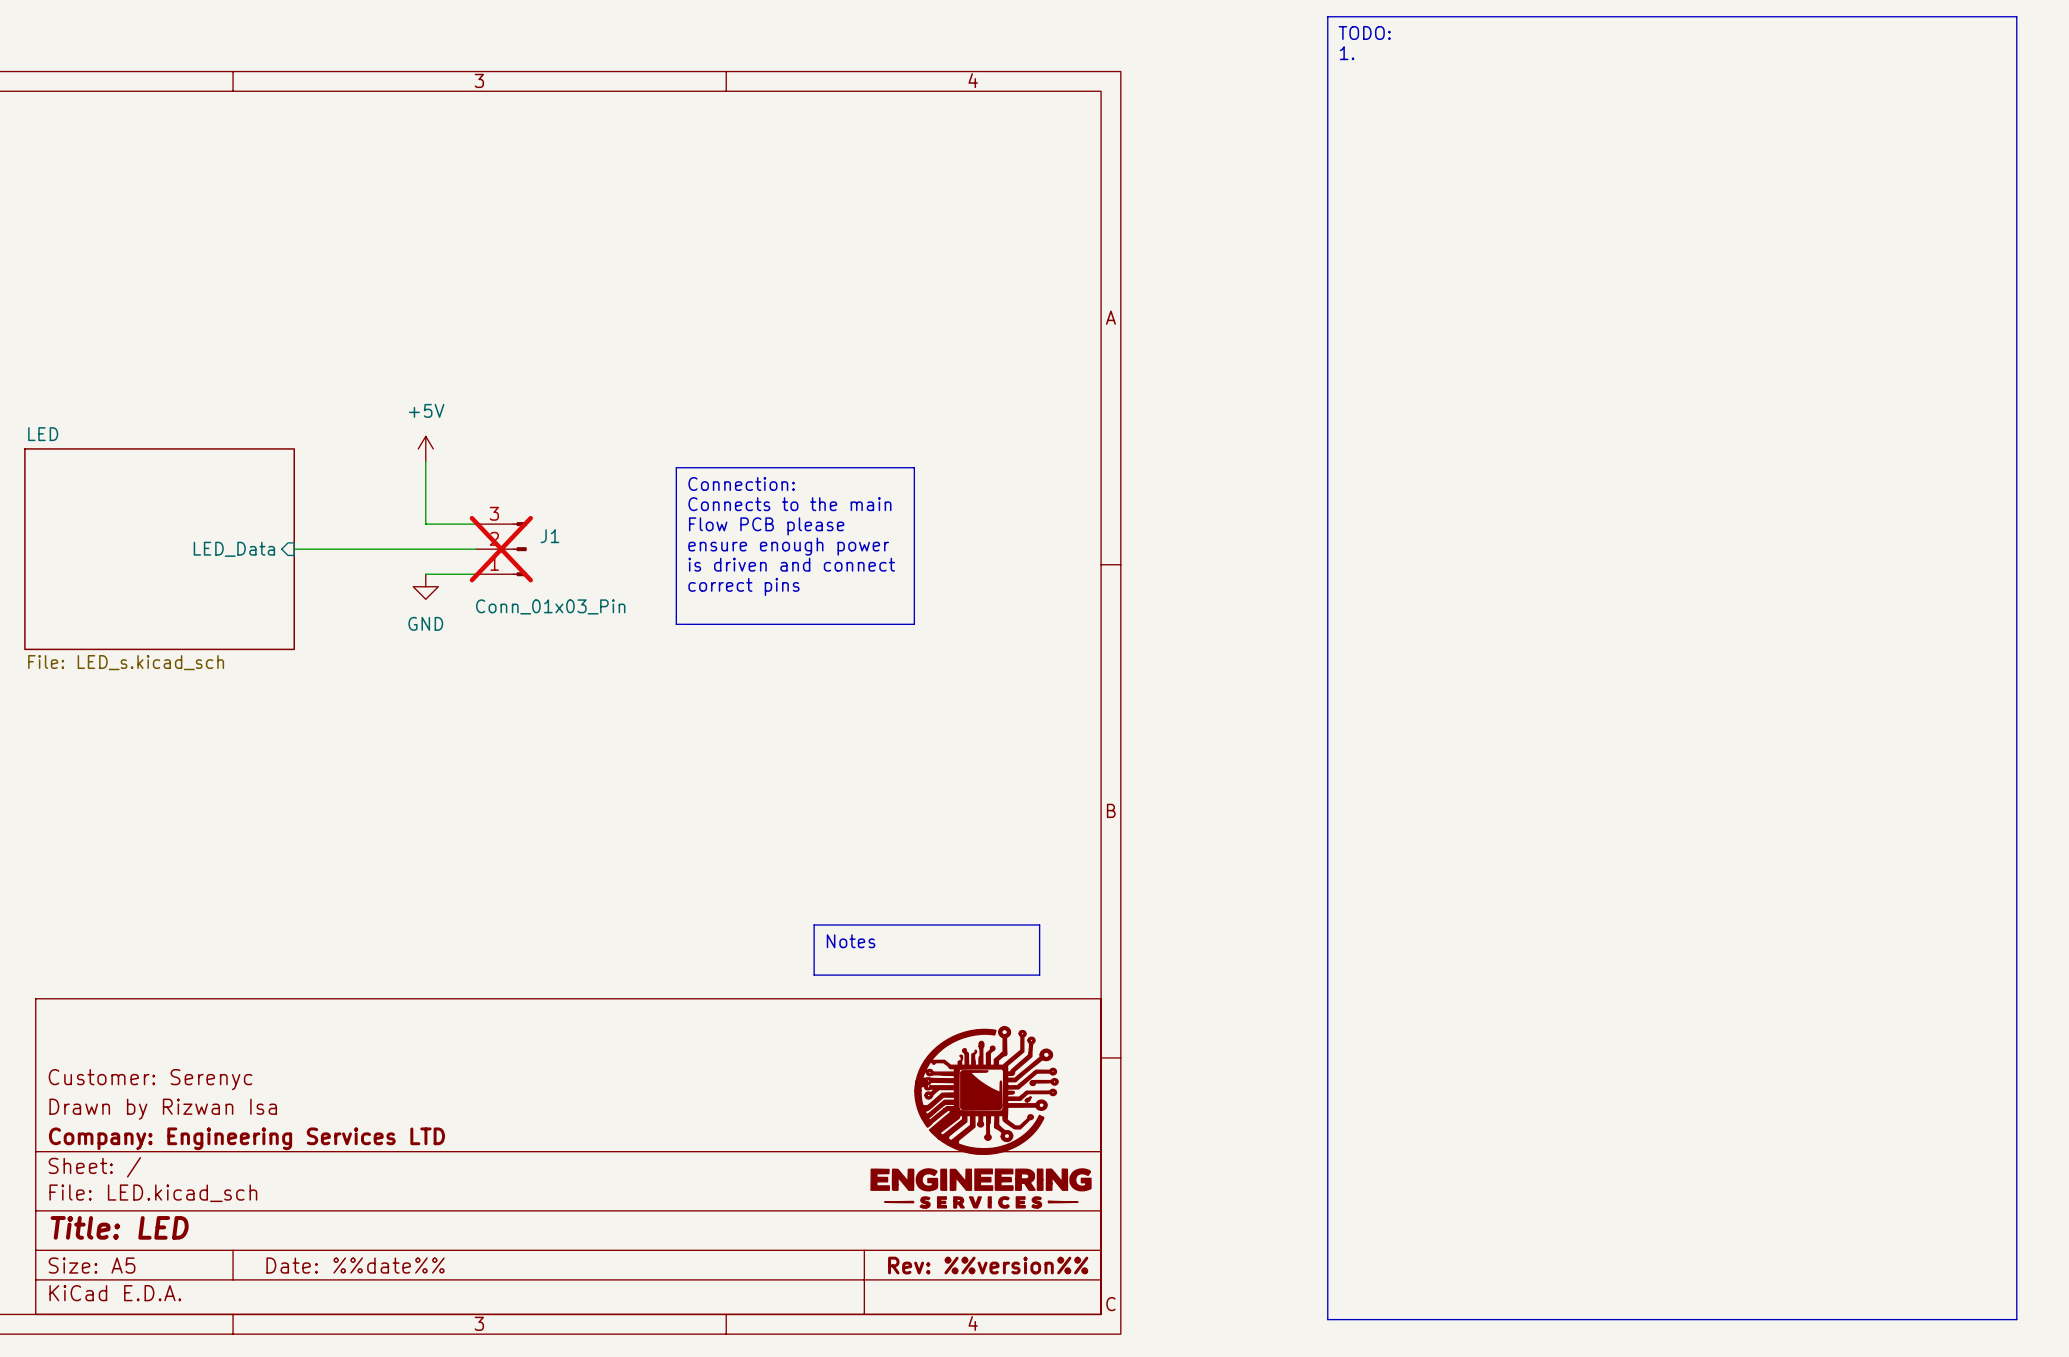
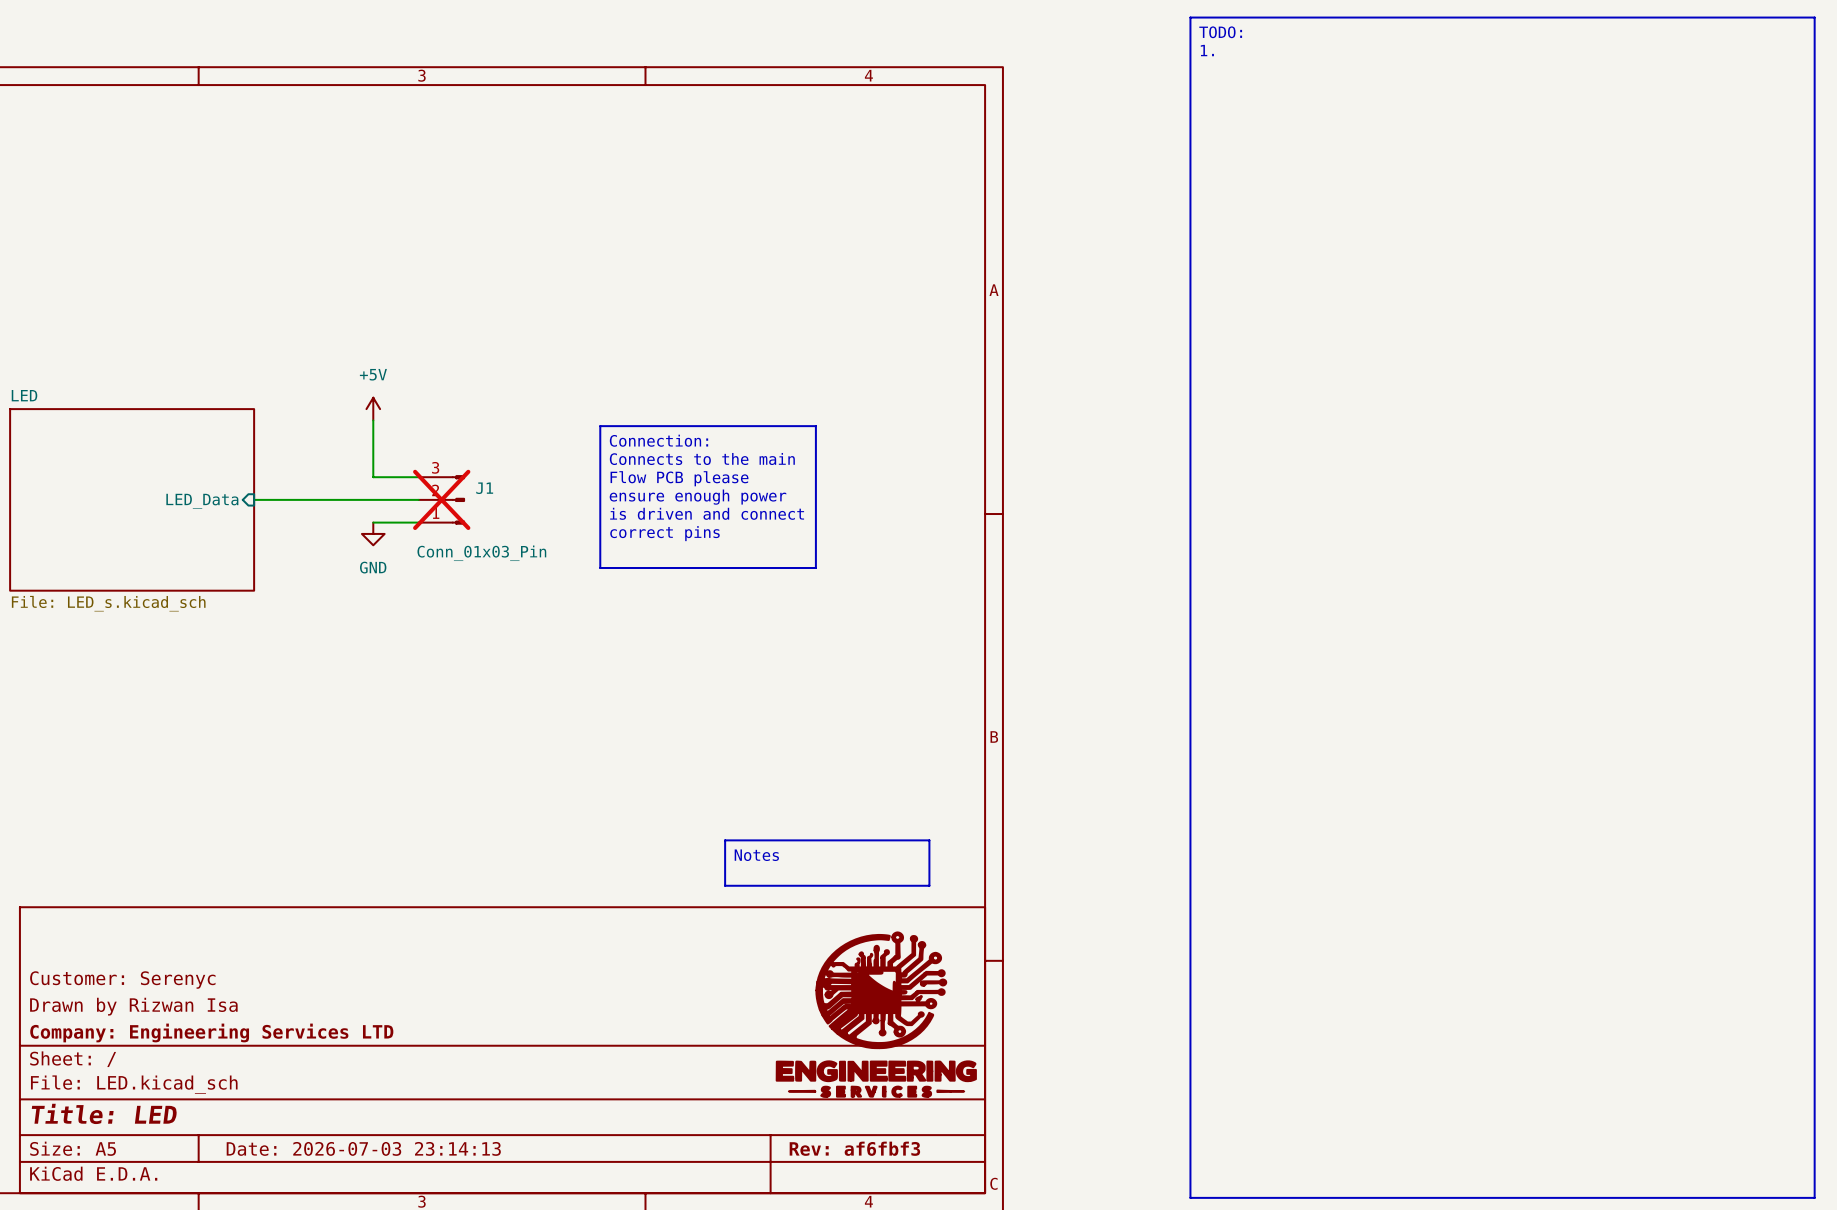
title block: Date: %%date%% (355, 1265) -> Date: 2026-07-03 23:14:13 (363, 1148)
title block: Rev: %%version%% (988, 1265) -> Rev: af6fbf3 (854, 1148)

